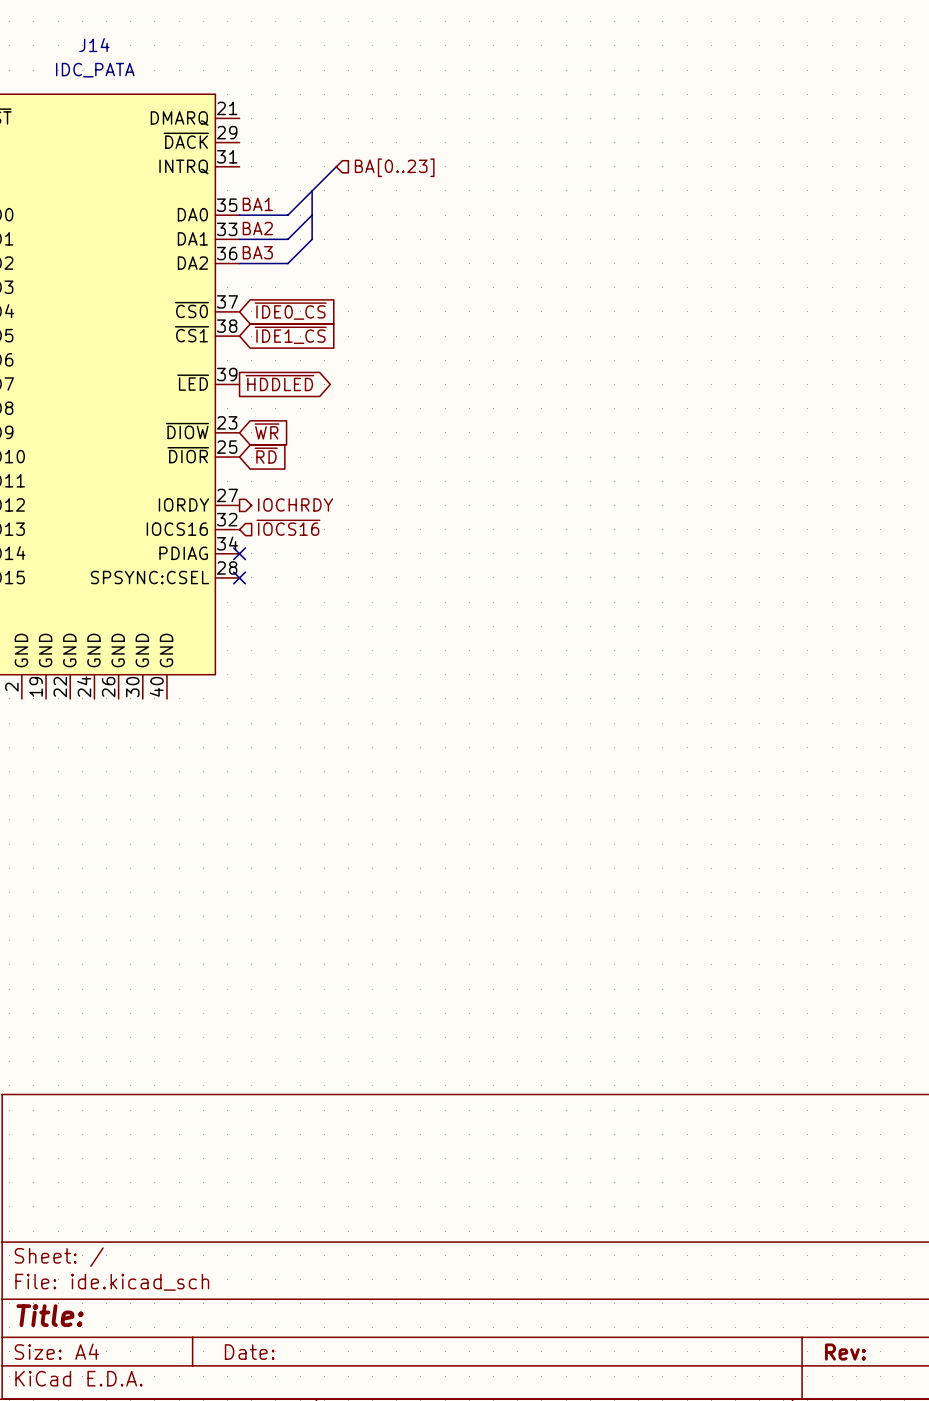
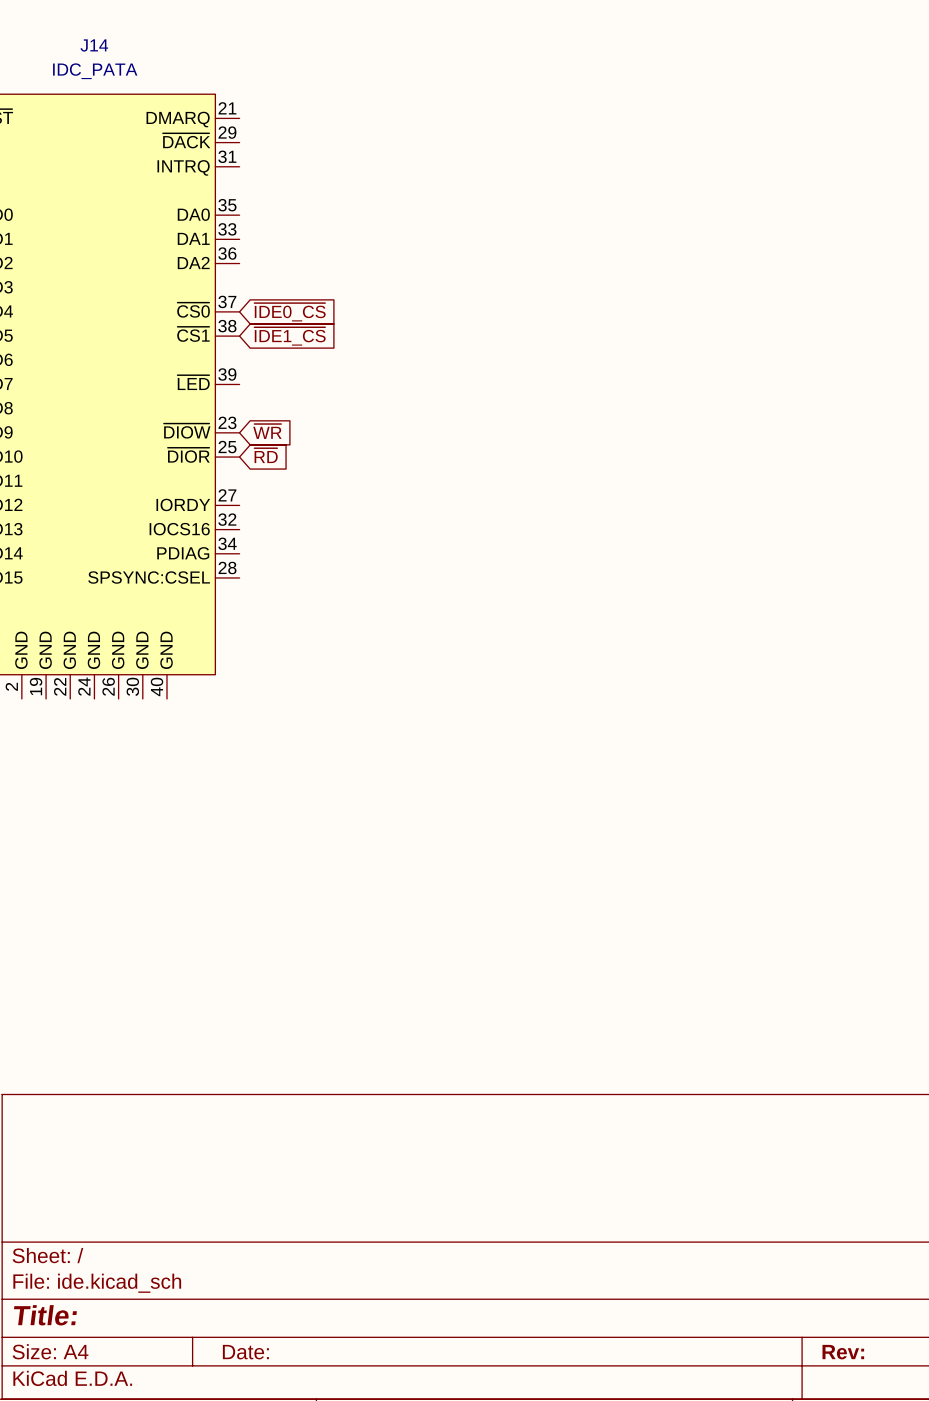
bus: (336, 166) (312, 190) (312, 239) -> none
hierarchical label: BA[0..23] (394, 167) -> none
wire: (312, 190) (287, 215) (239, 215) -> none
label: BA1 (257, 204) -> none
wire: (312, 215) (287, 239) (239, 239) -> none
label: BA2 (257, 228) -> none
wire: (312, 239) (287, 263) (239, 263) -> none
label: BA3 (257, 252) -> none
global label: ~{HDDLED} (279, 383) -> none
hierarchical label: IOCHRDY (295, 504) -> none
hierarchical label: ~{IOCS16} (288, 527) -> none
no-connect mark: (239, 553) -> none
no-connect mark: (239, 577) -> none

